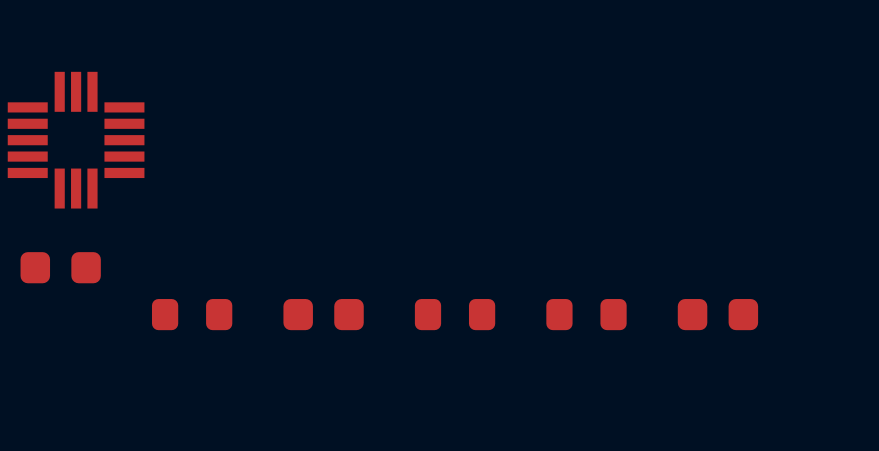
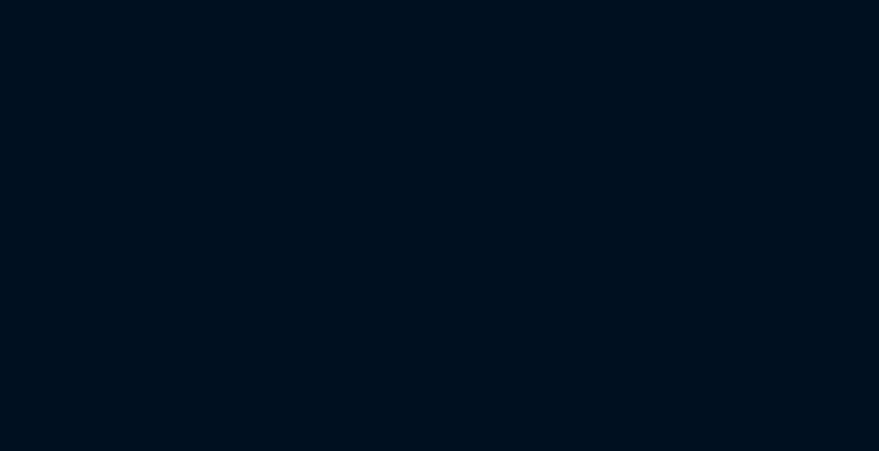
part: (76, 140) -> none
part: (60, 267) -> none
part: (192, 314) -> none
part: (323, 314) -> none
part: (455, 314) -> none
part: (586, 314) -> none
part: (717, 314) -> none

